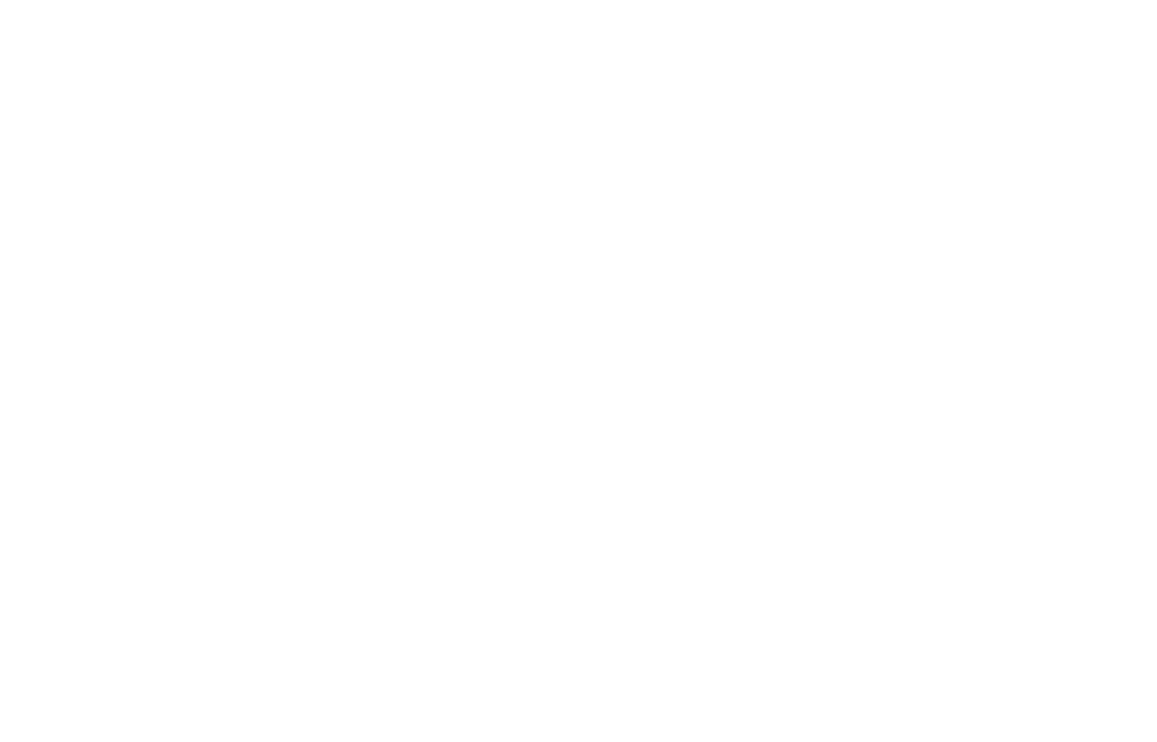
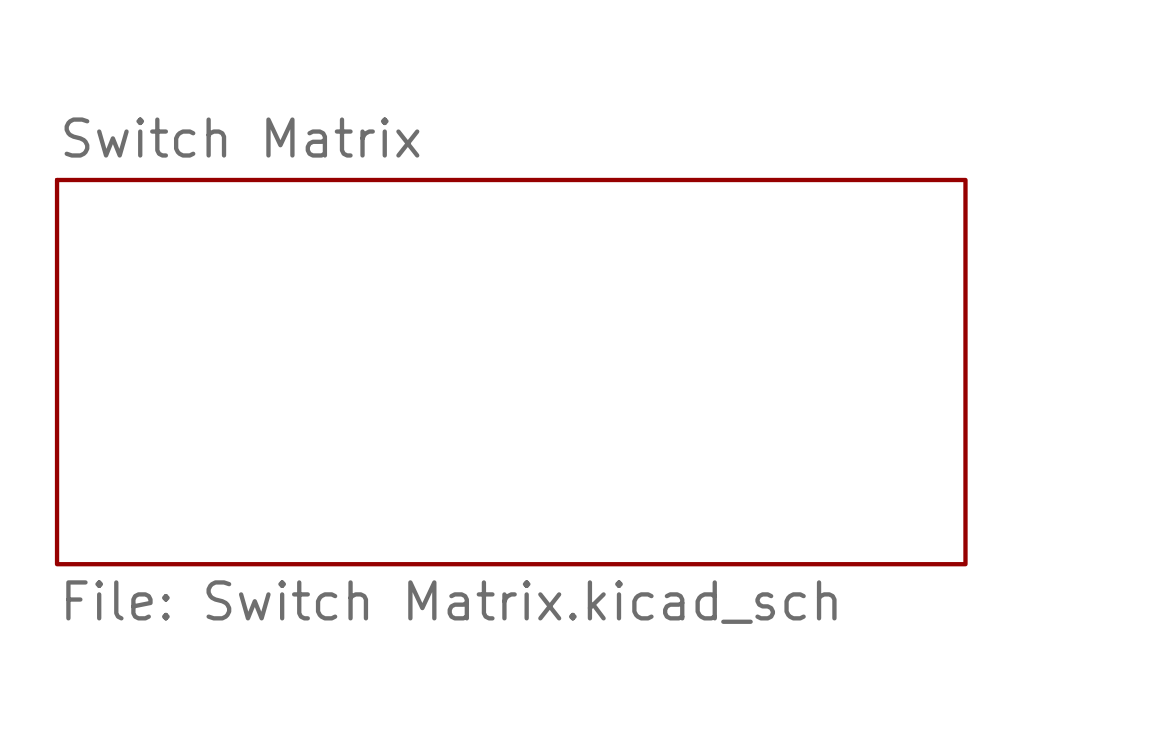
sheet Switch Matrix: none -> File: Switch Matrix.kicad_sch (511, 372)

